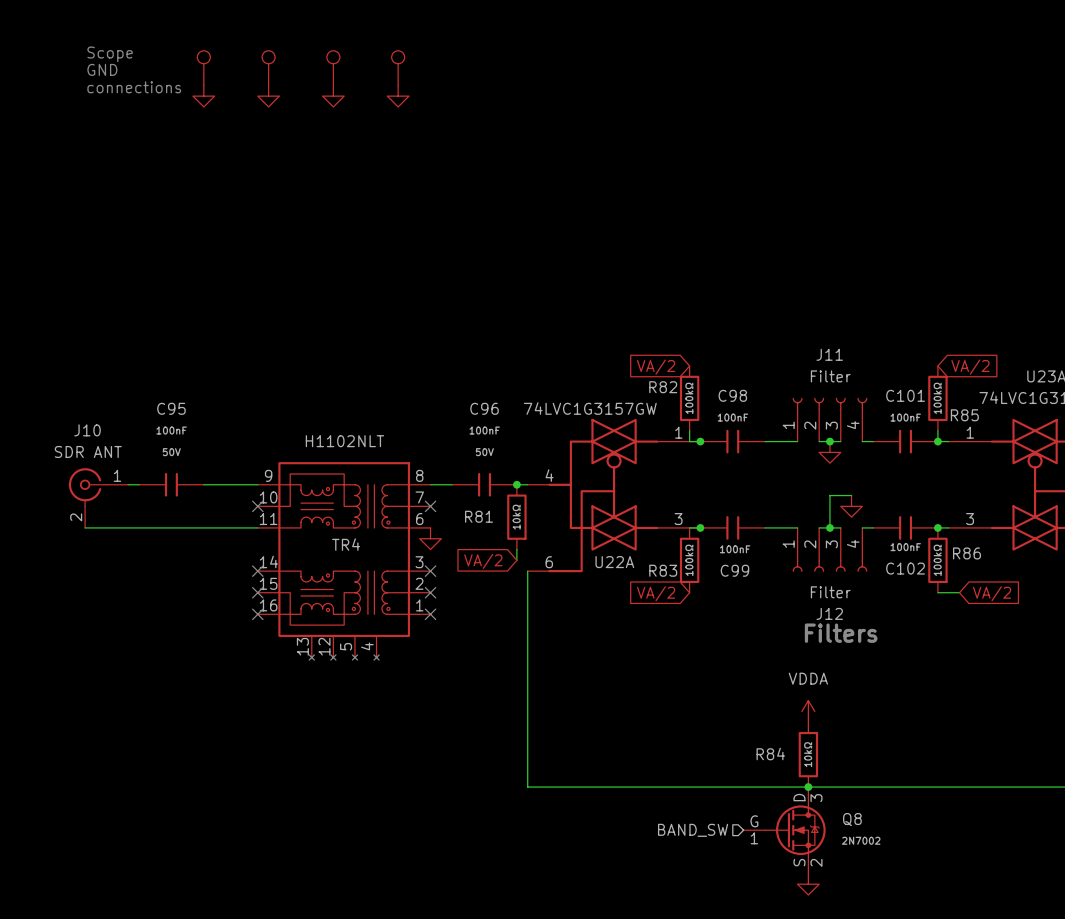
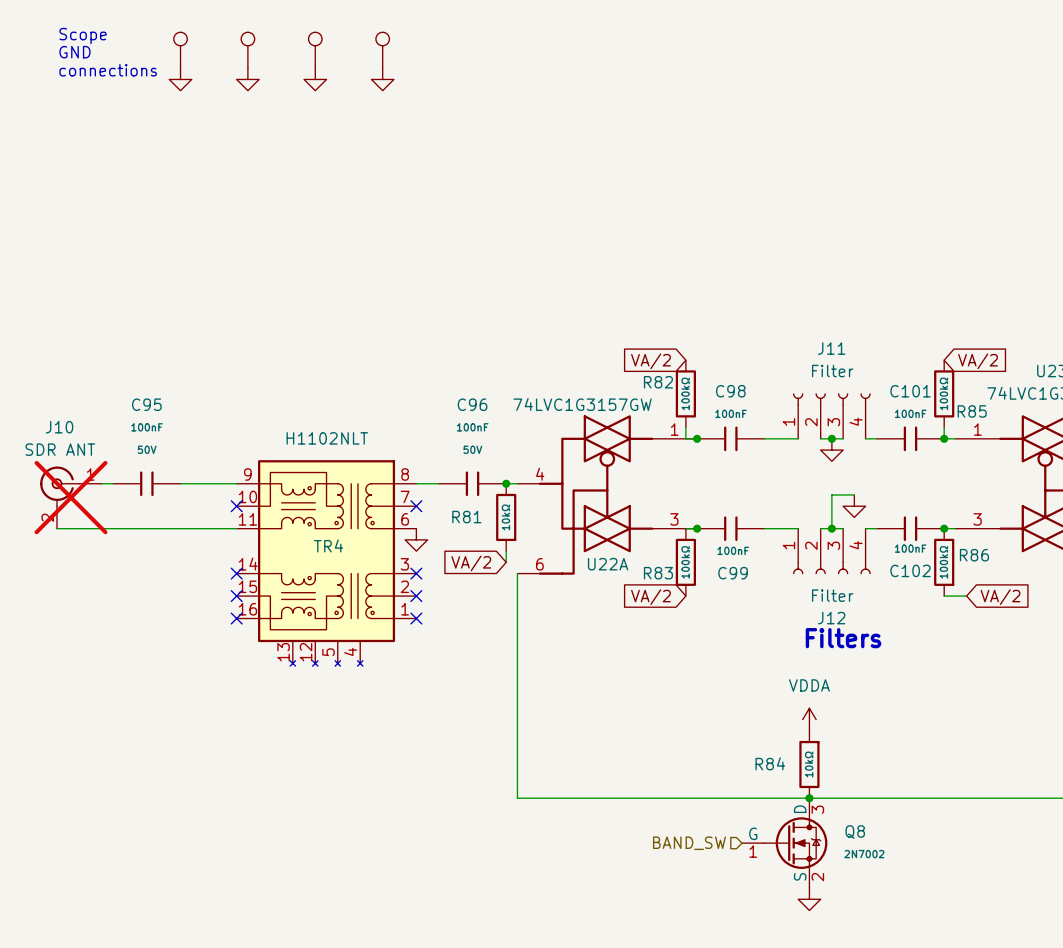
J10 do-not-place cross: none -> (71, 497)

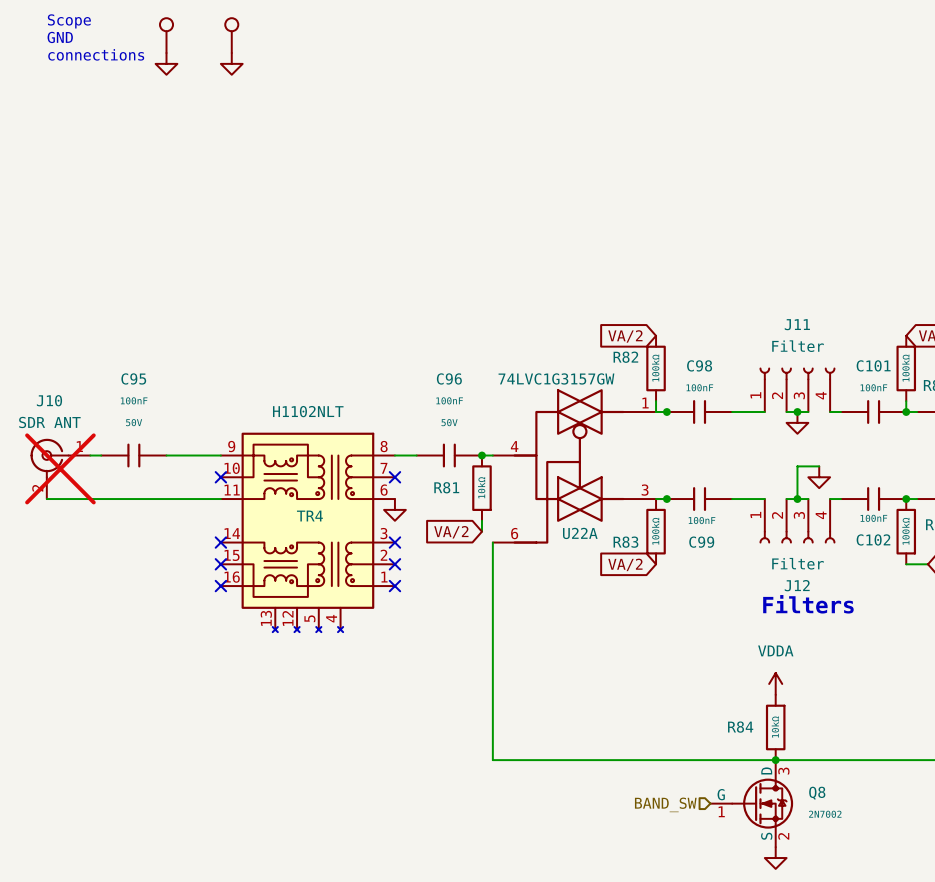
part: (315, 50) -> none
part: (382, 50) -> none
power symbol: (315, 79) -> none
power symbol: (382, 79) -> none

